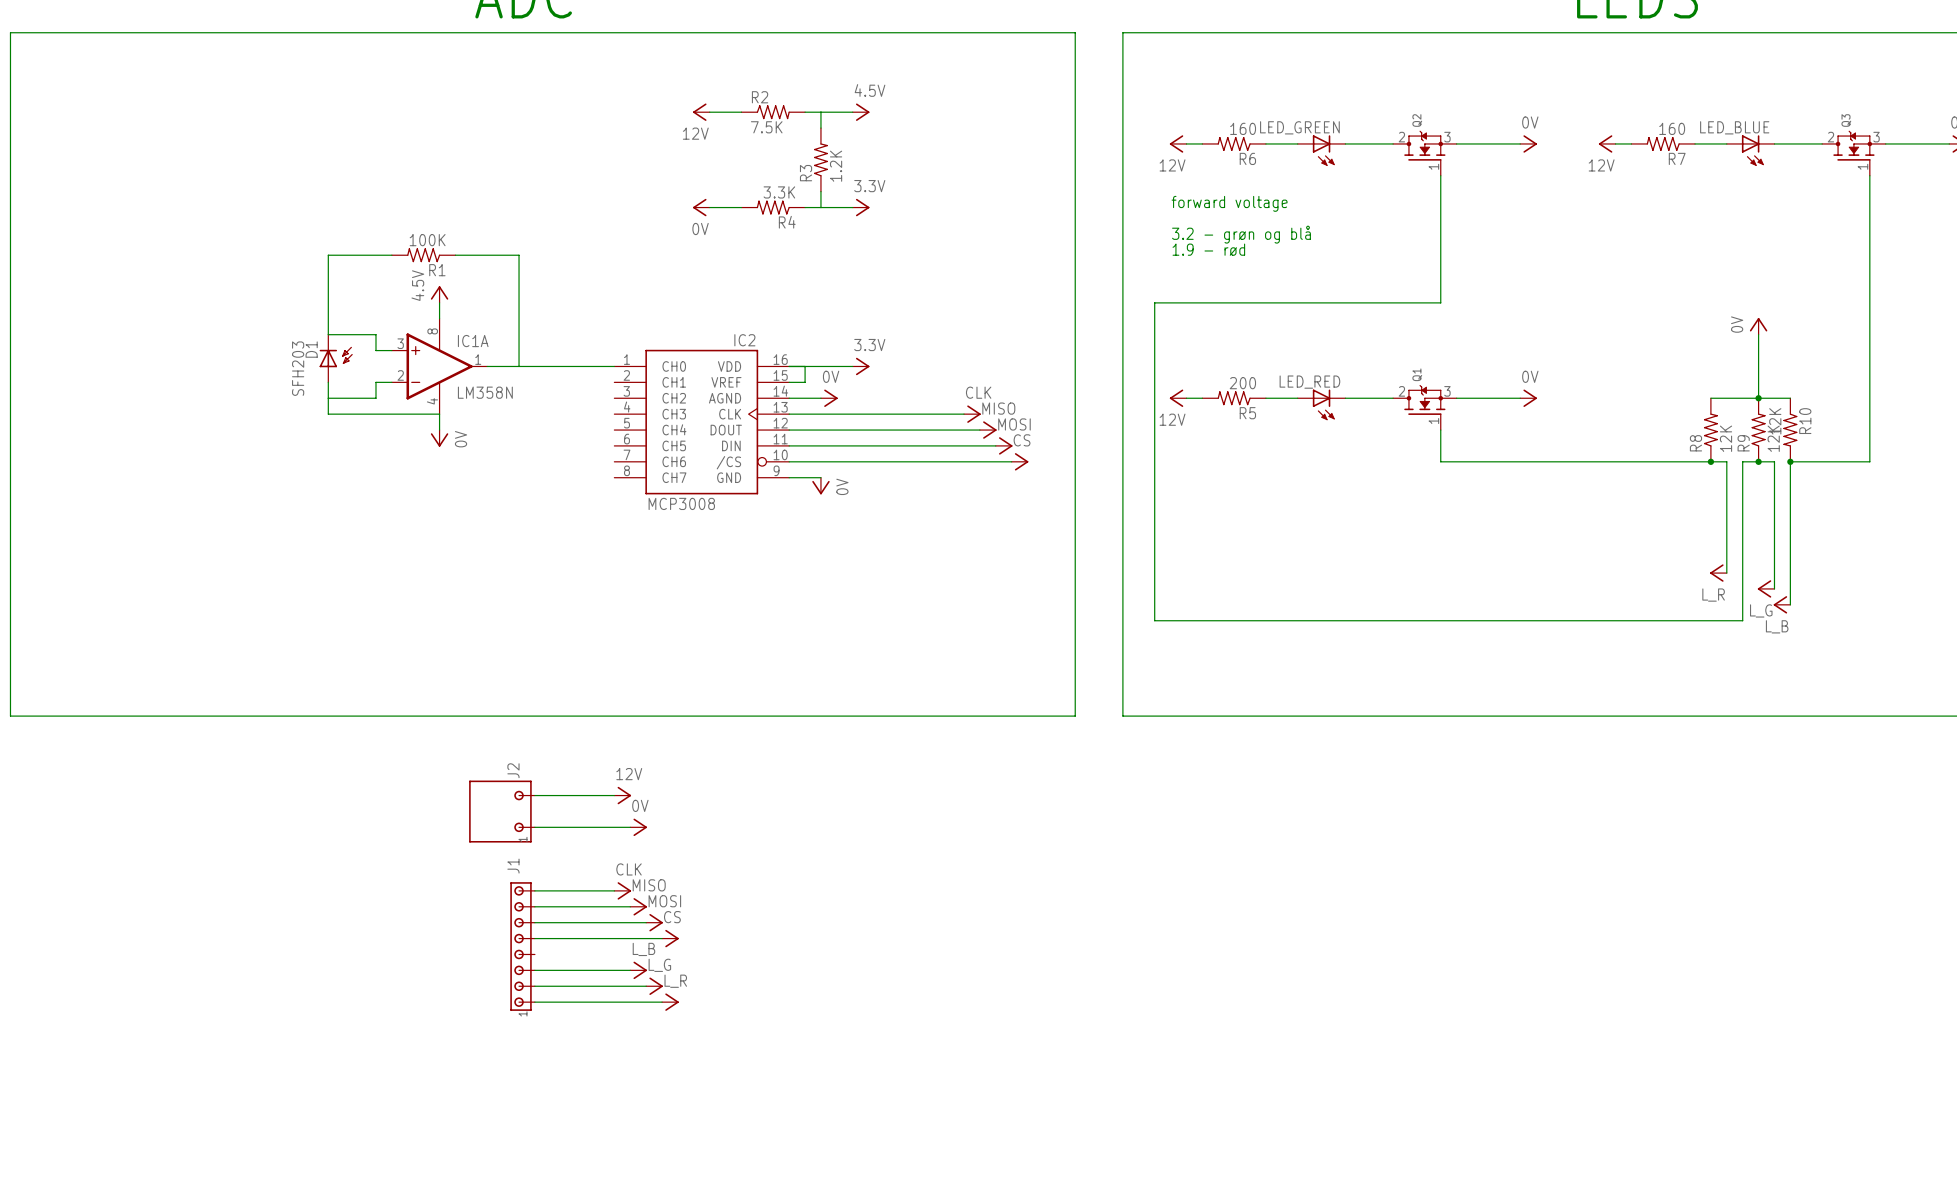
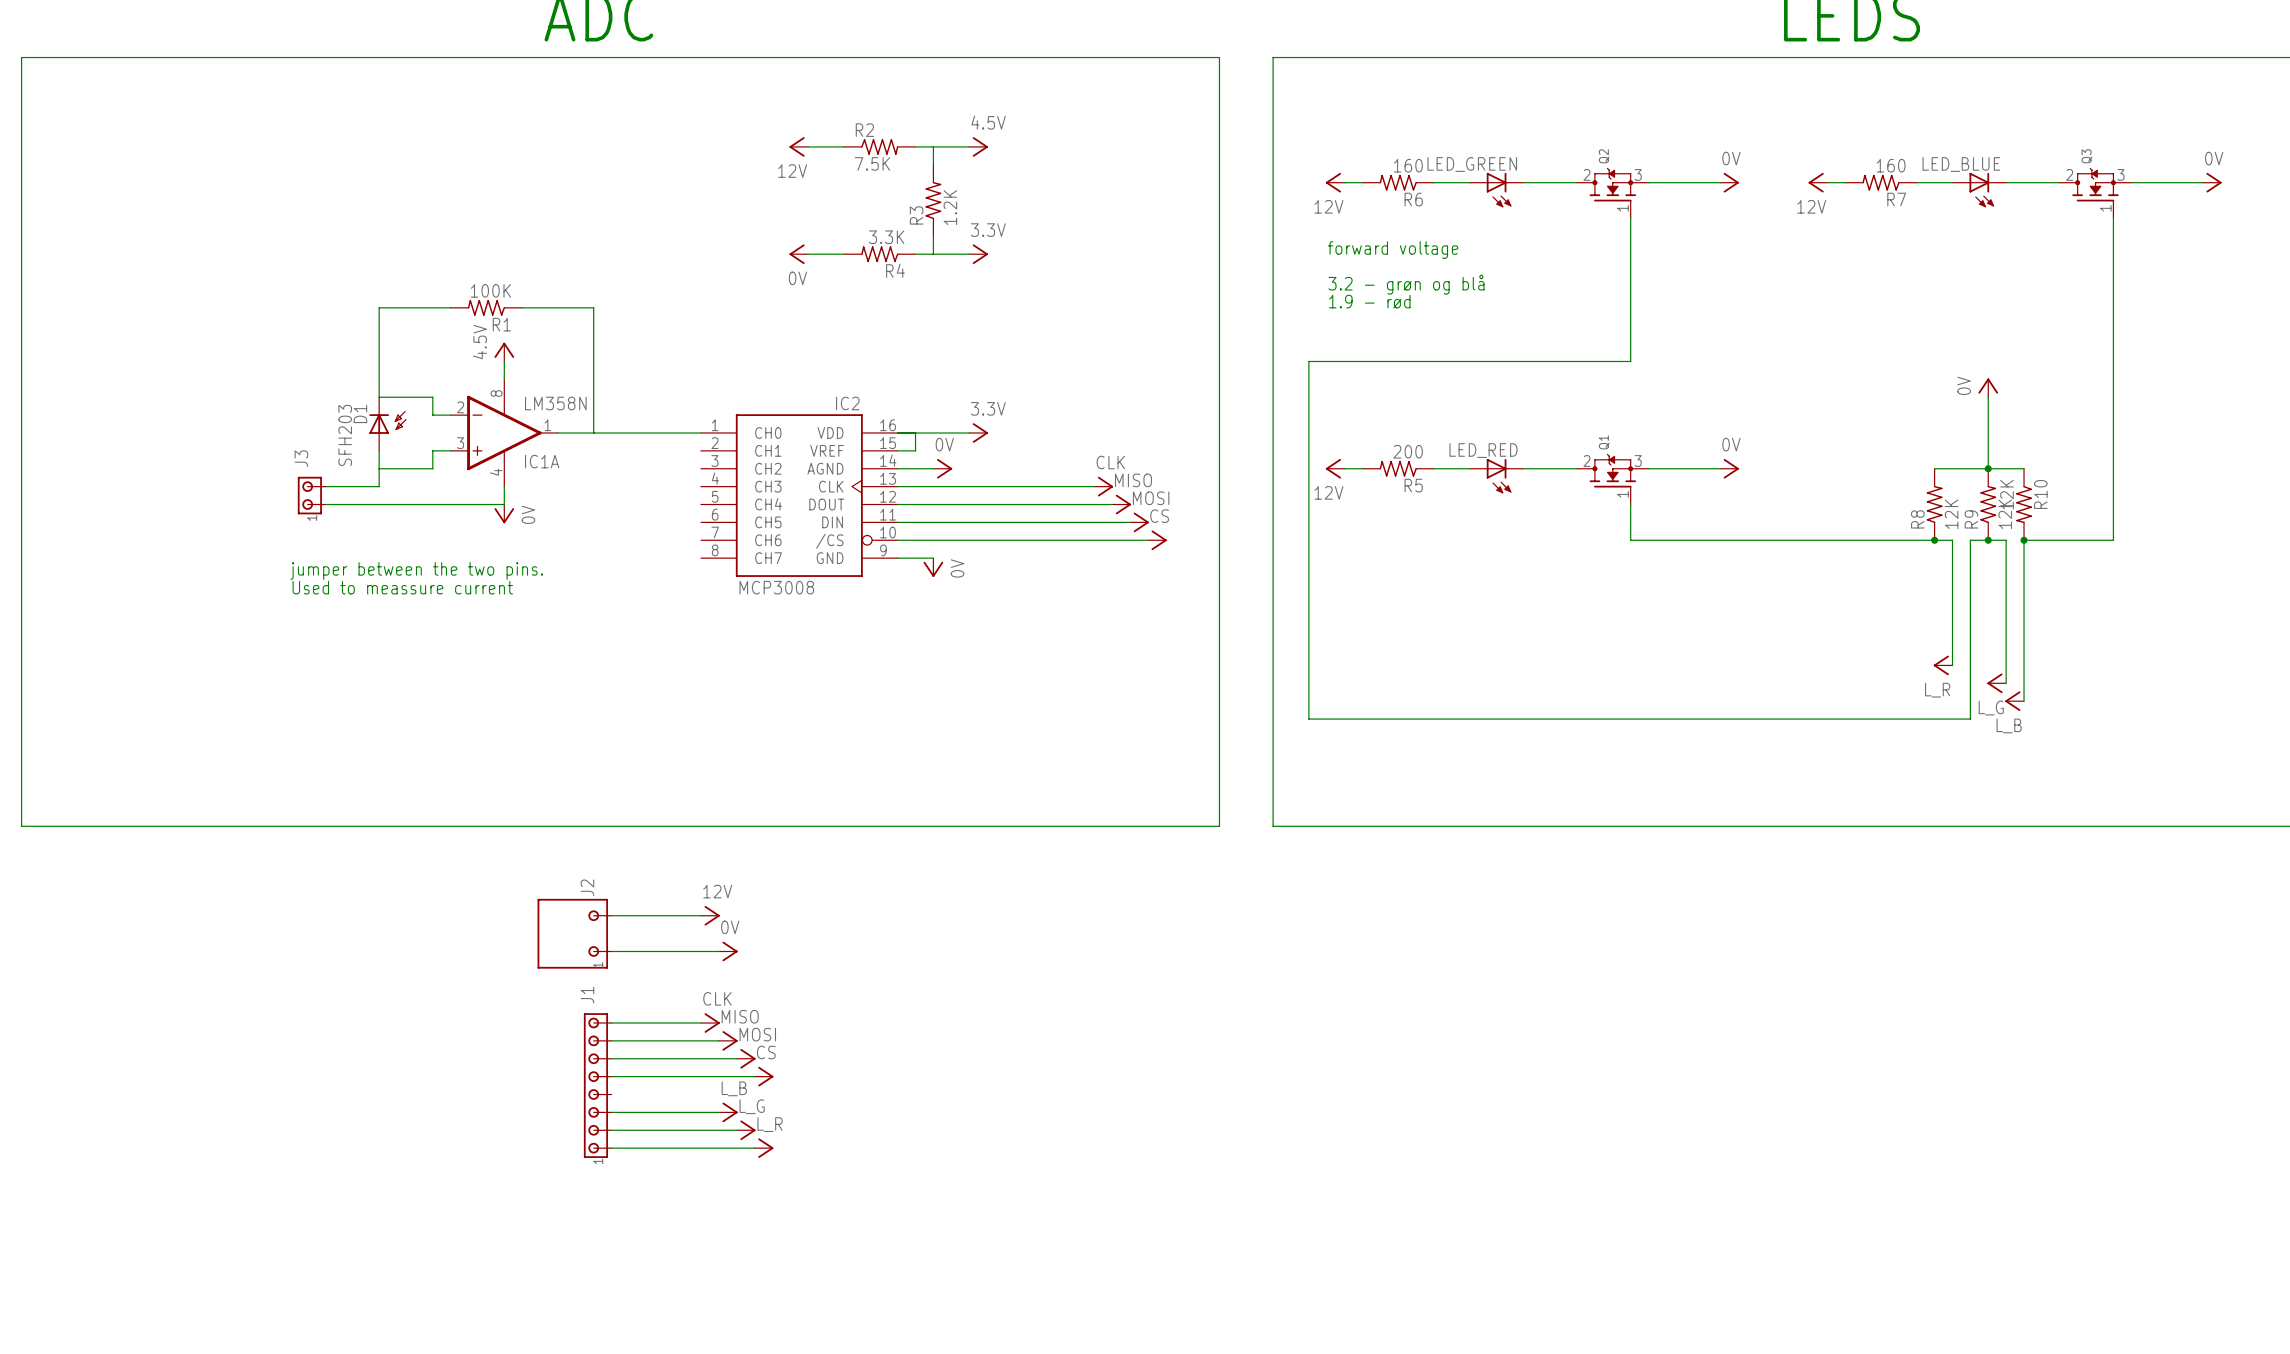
IC1A flip: as is (439, 366) -> up-down (504, 432)
wire: (328, 414) (439, 414) -> (379, 486) (325, 486)
J3: none -> (311, 495)
wire: none -> (325, 504) (504, 504)
text: none -> jumper between the two pins. (416, 570)
text: none -> Used to meassure current (402, 587)

